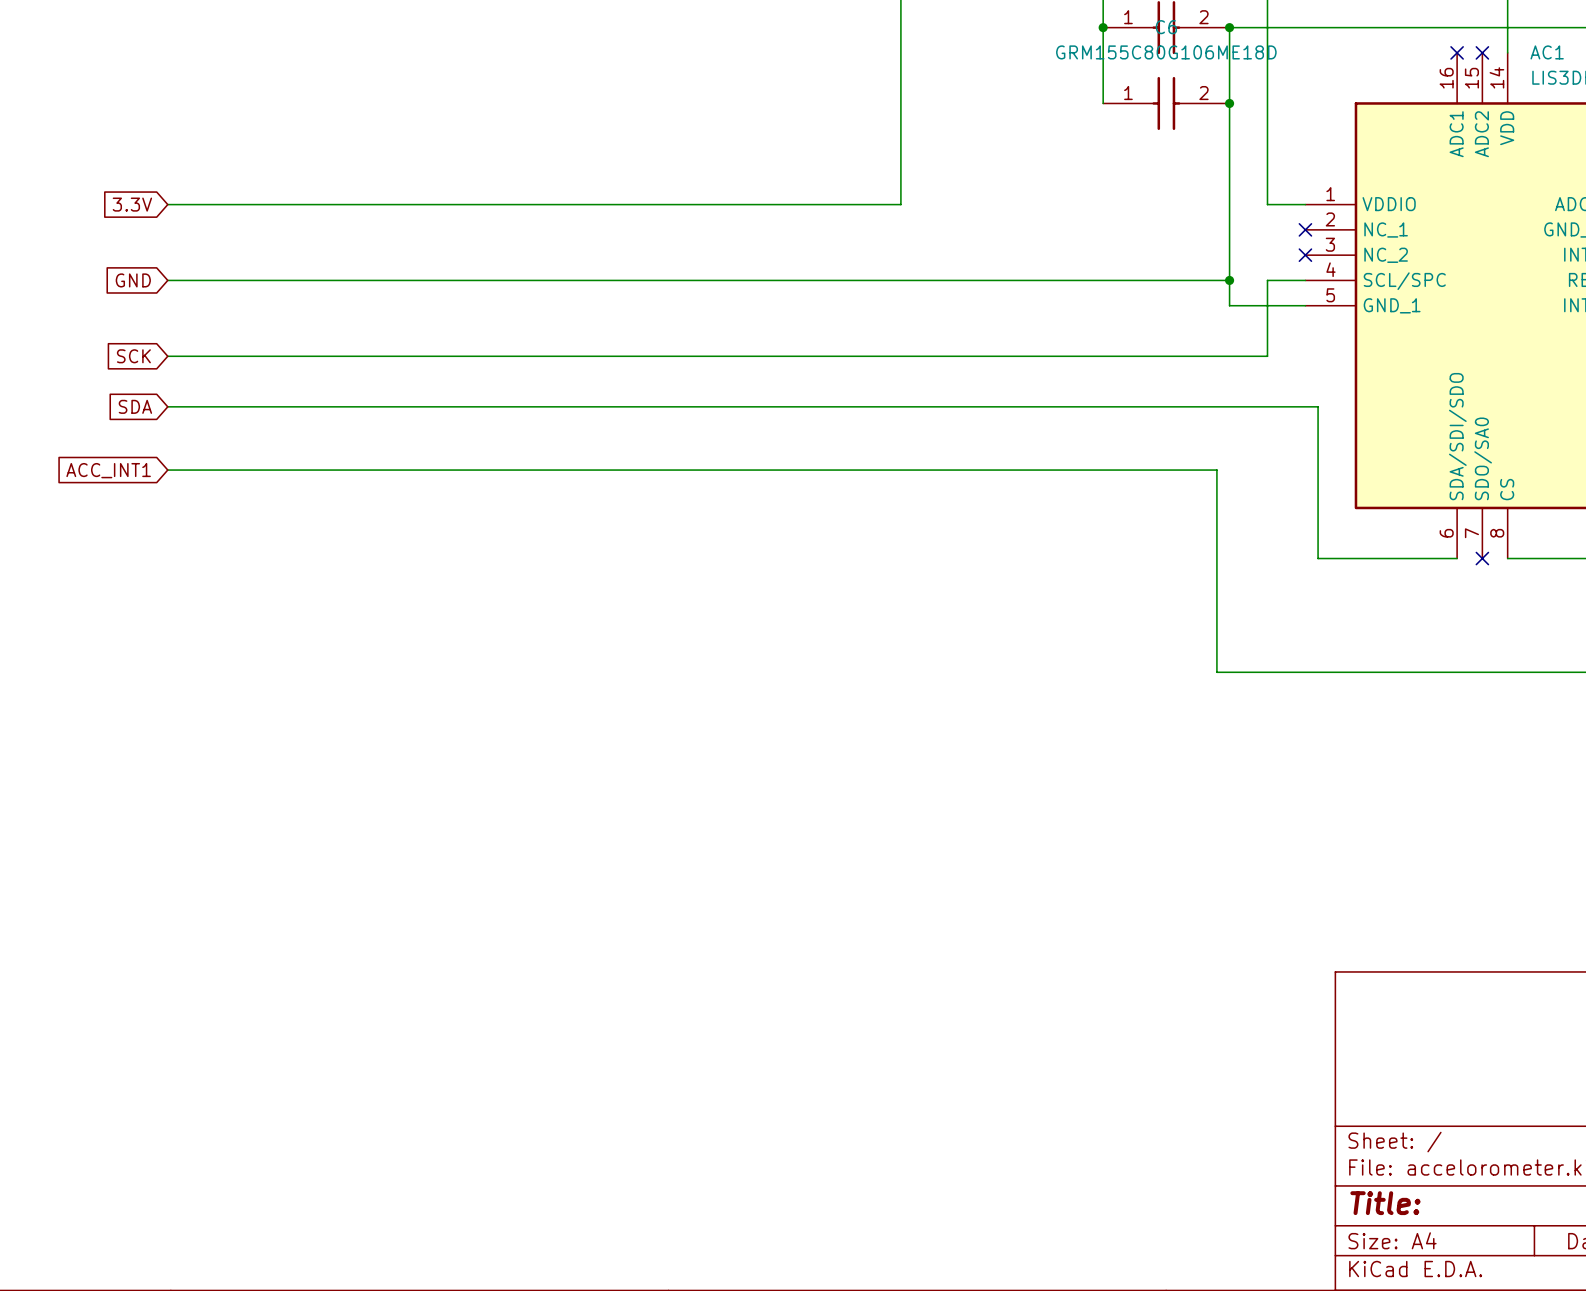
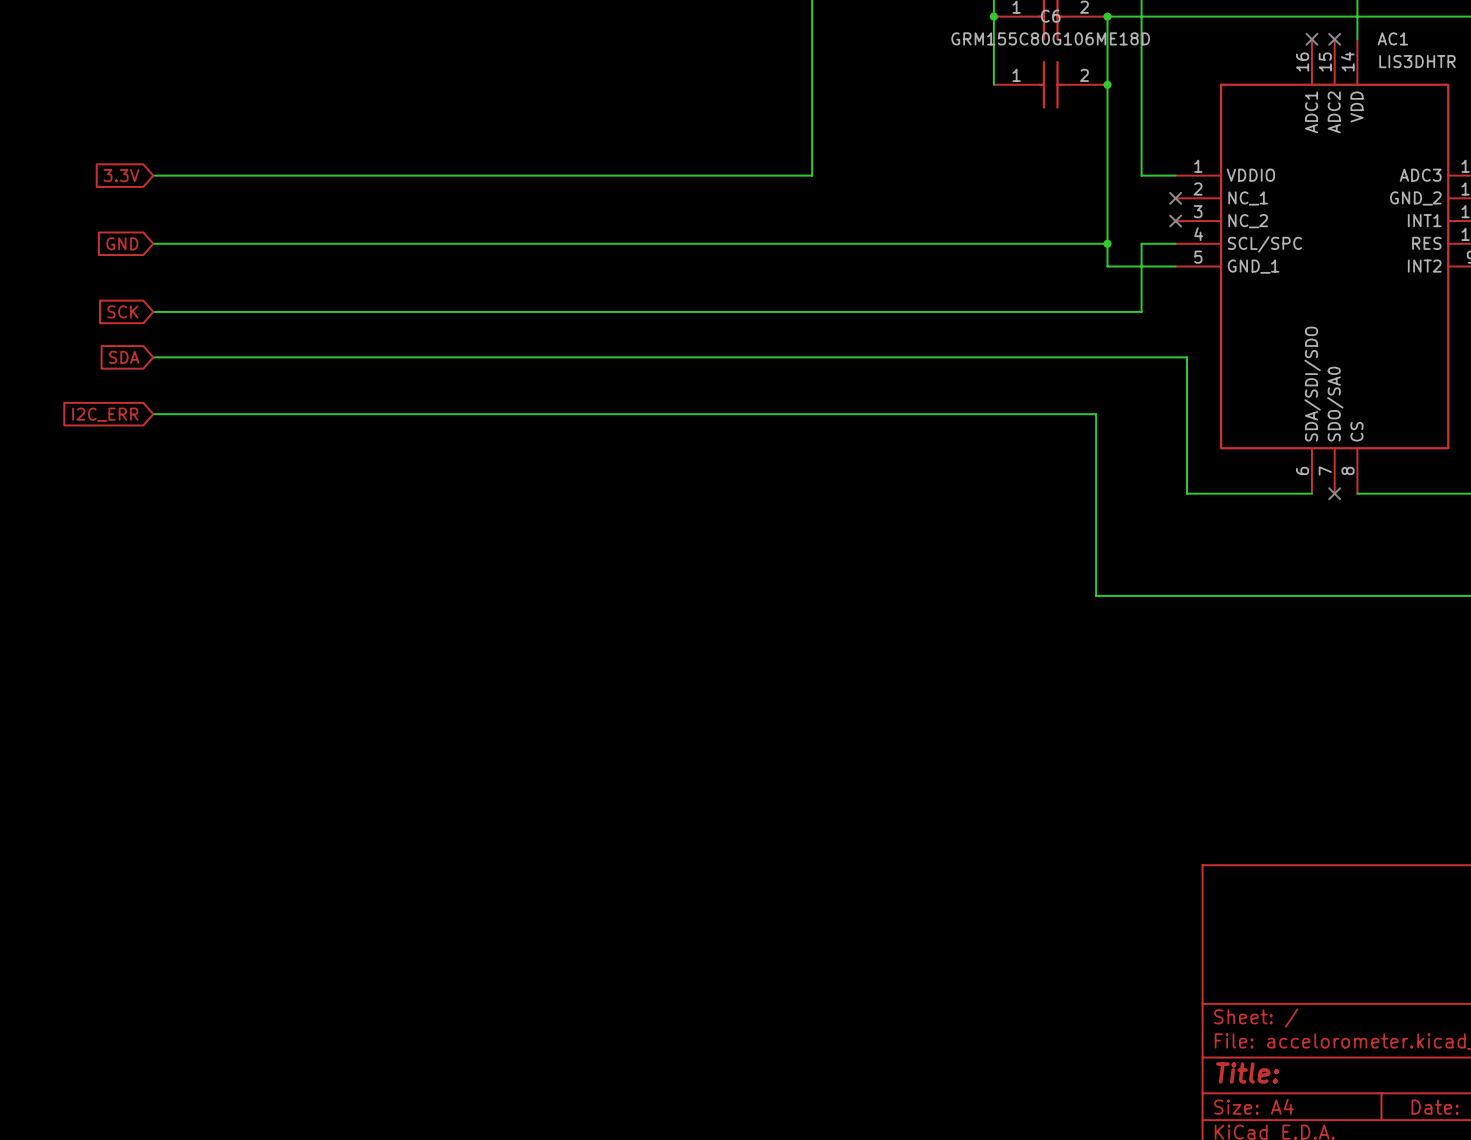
global label: ACC_INT1 (108, 470) -> I2C_ERR (105, 414)

